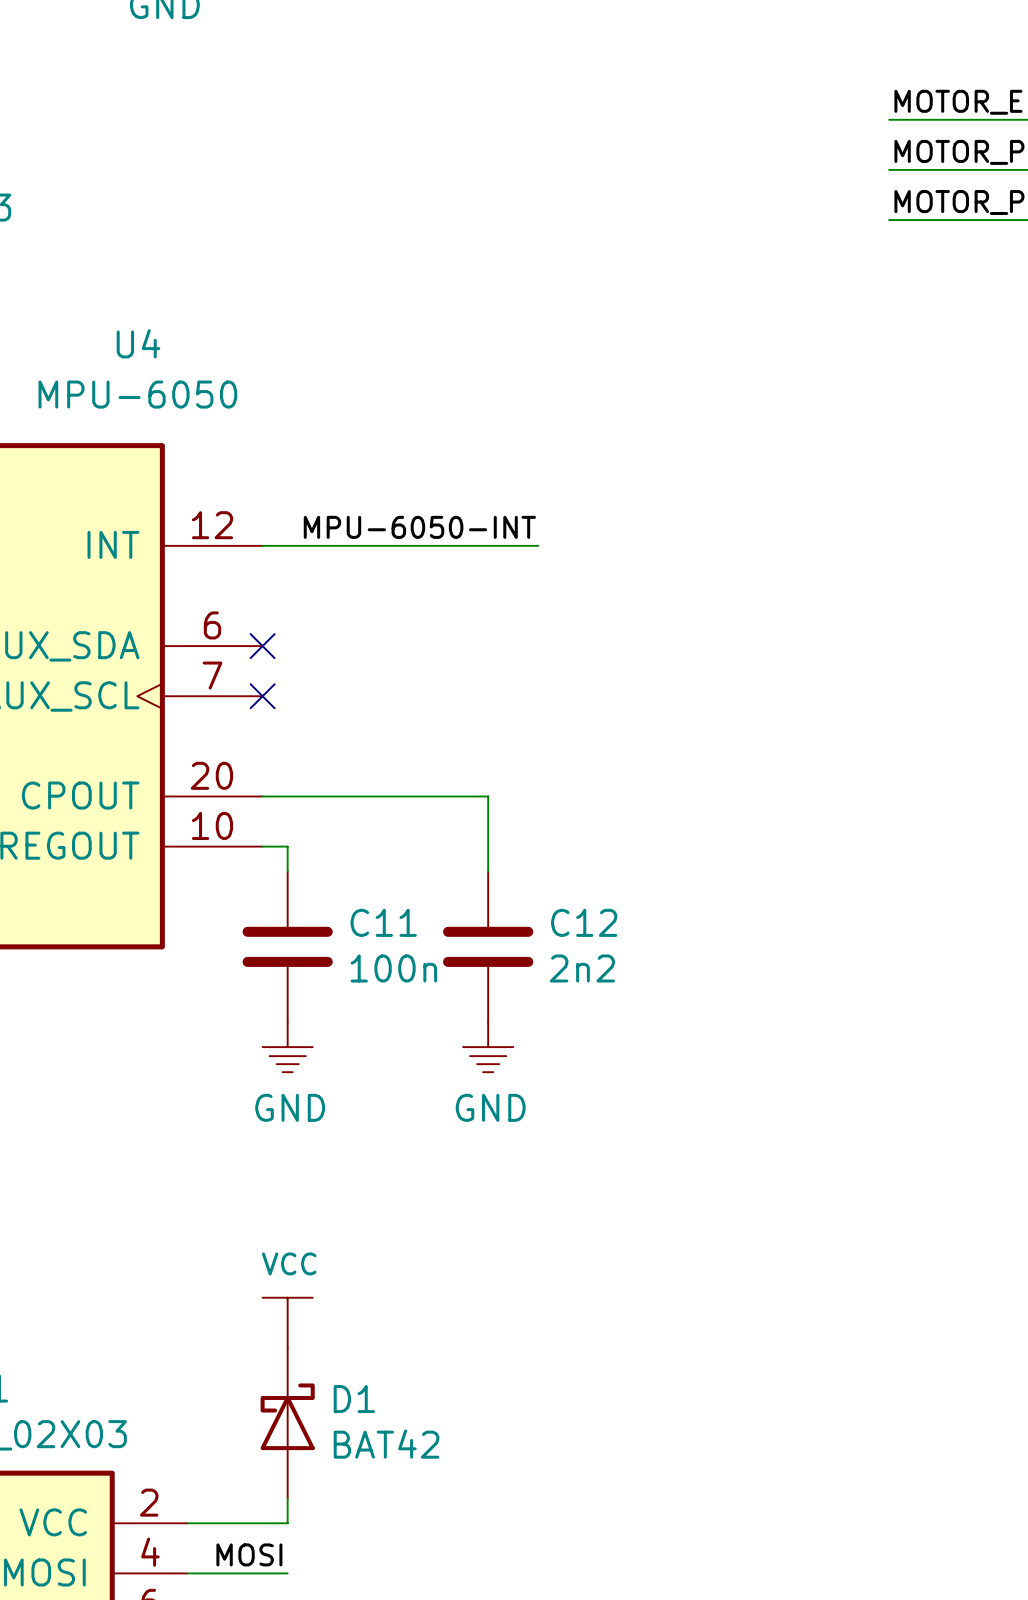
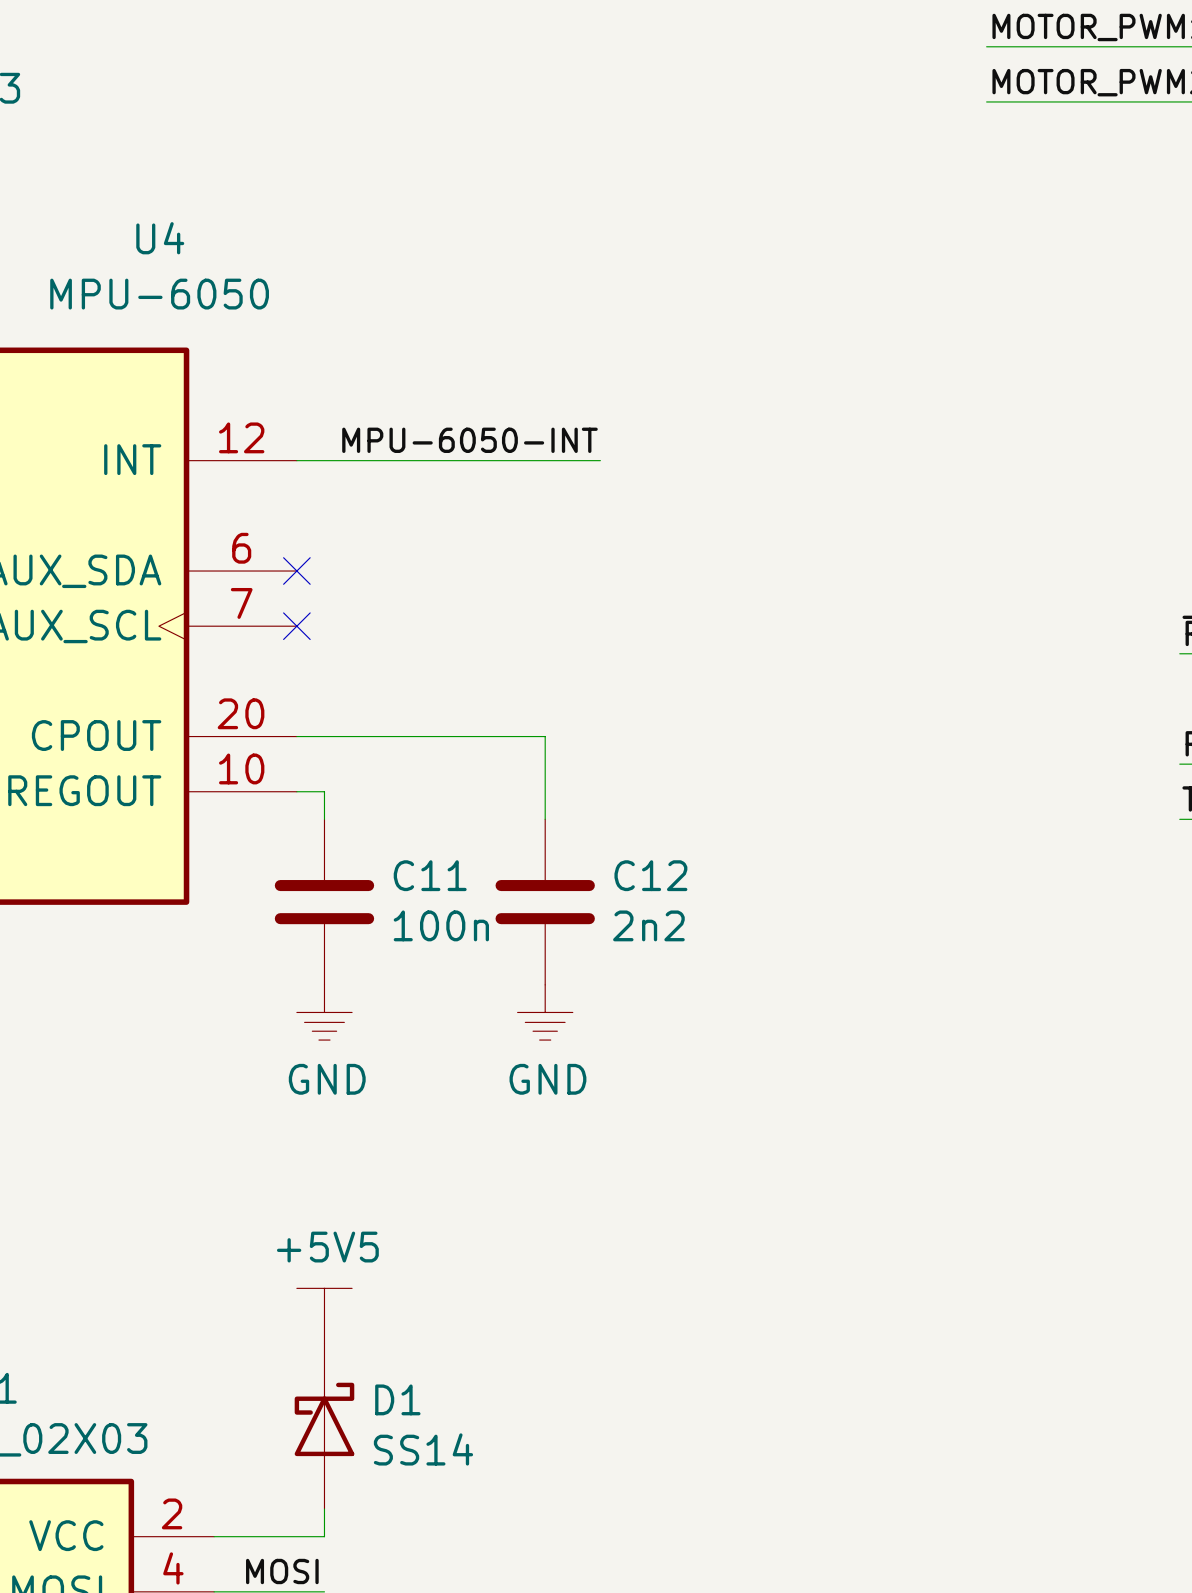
power symbol: VCC (287, 1322) -> +5V5 (324, 1315)
D1 value: BAT42 (386, 1444) -> SS14 (423, 1449)

